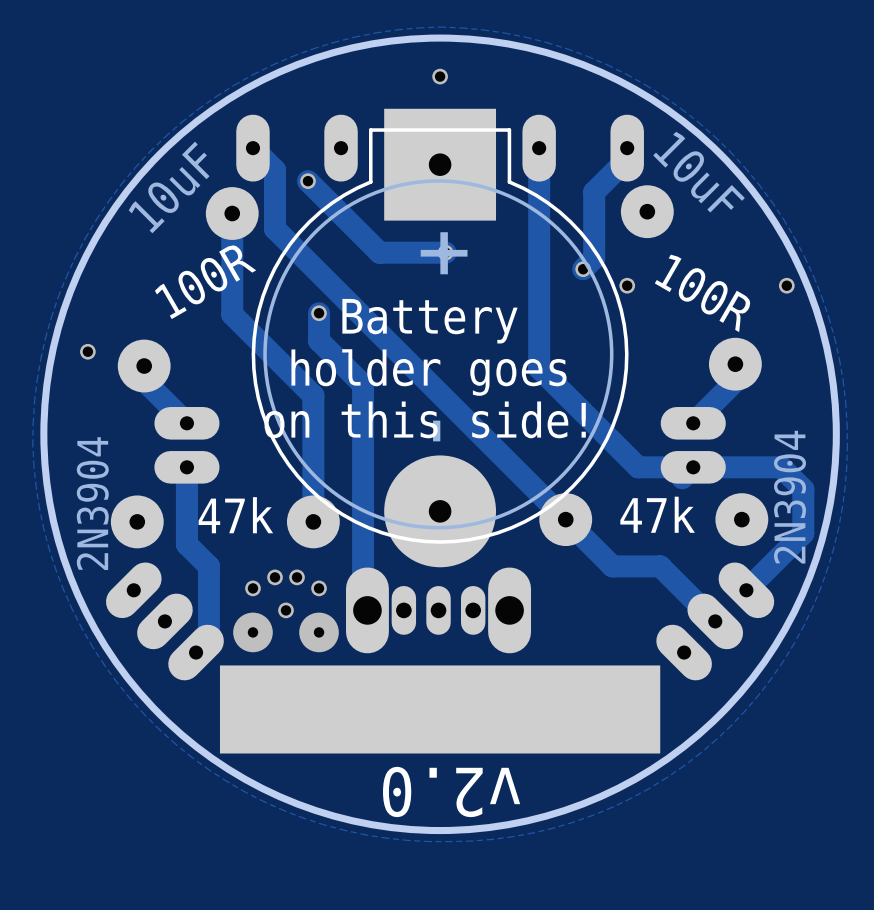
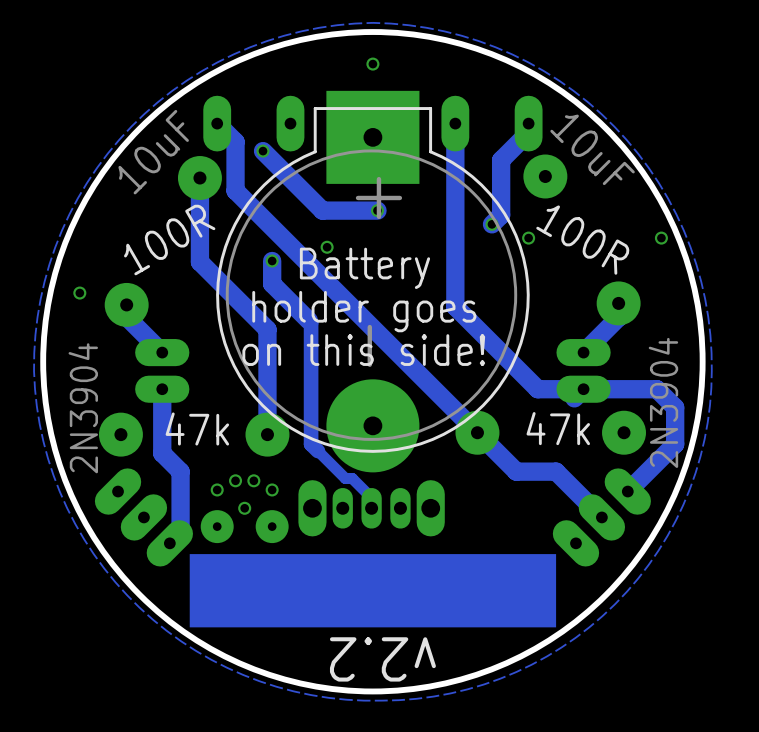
via: none -> (327, 247)
track: (363, 384) (363, 606) (367, 610) (368, 609) -> (308, 320) (311, 322) (311, 444) (345, 478) (352, 478) (371, 497) (371, 508)
part footprint: [346, 567, 532, 654] -> [298, 480, 445, 537]
text: v2.0 (451, 791) -> v2.2 (382, 659)

